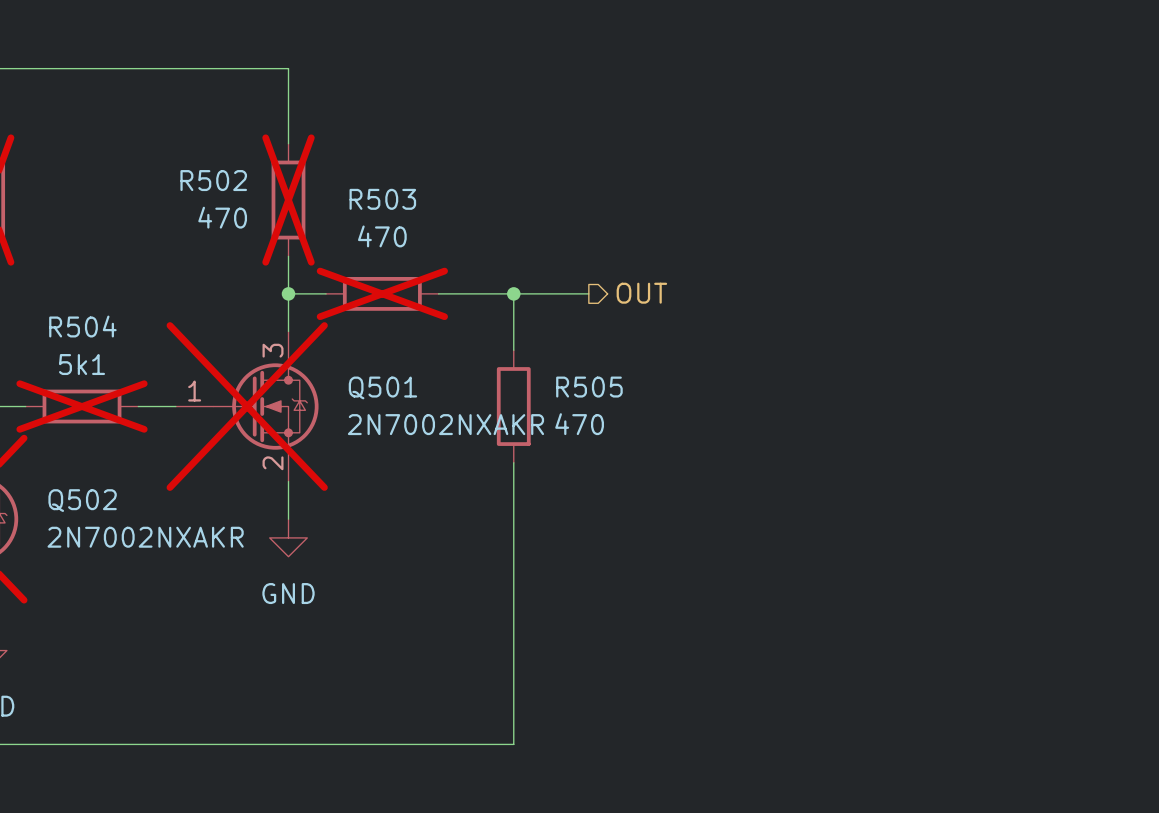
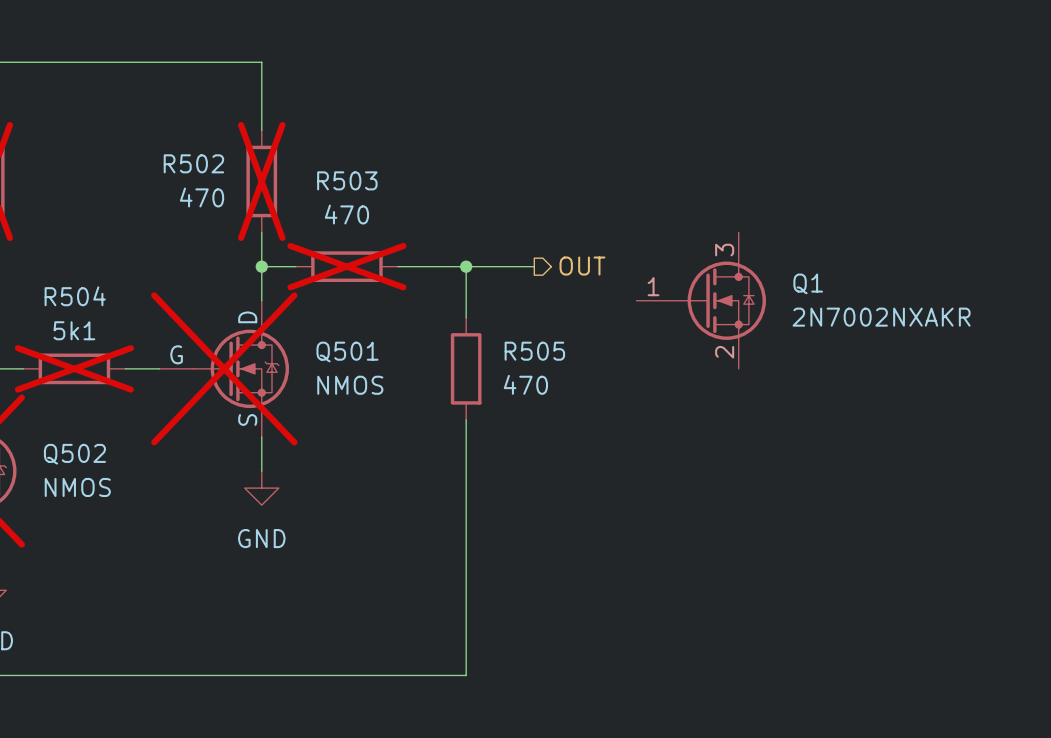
Q1: none -> 2N7002NXAKR (701, 300)
Q501 pin name: none -> D (247, 317)
Q501 pin number: 3 (273, 350) -> none
Q501 pin name: none -> G (176, 354)
Q501 pin number: 1 (194, 391) -> none
Q501 value: 2N7002NXAKR (445, 424) -> NMOS (350, 385)
Q501 pin name: none -> S (247, 419)
Q501 pin number: 2 (273, 463) -> none
Q502 value: 2N7002NXAKR (145, 537) -> NMOS (77, 487)

